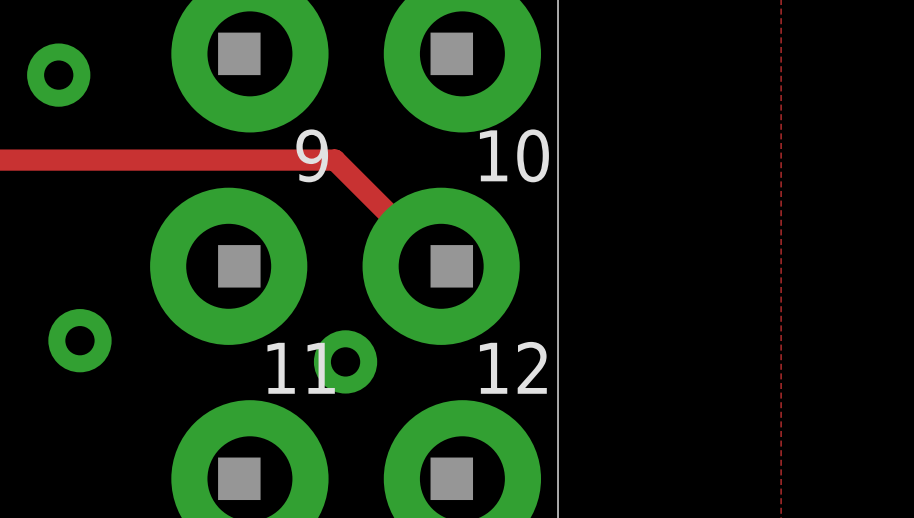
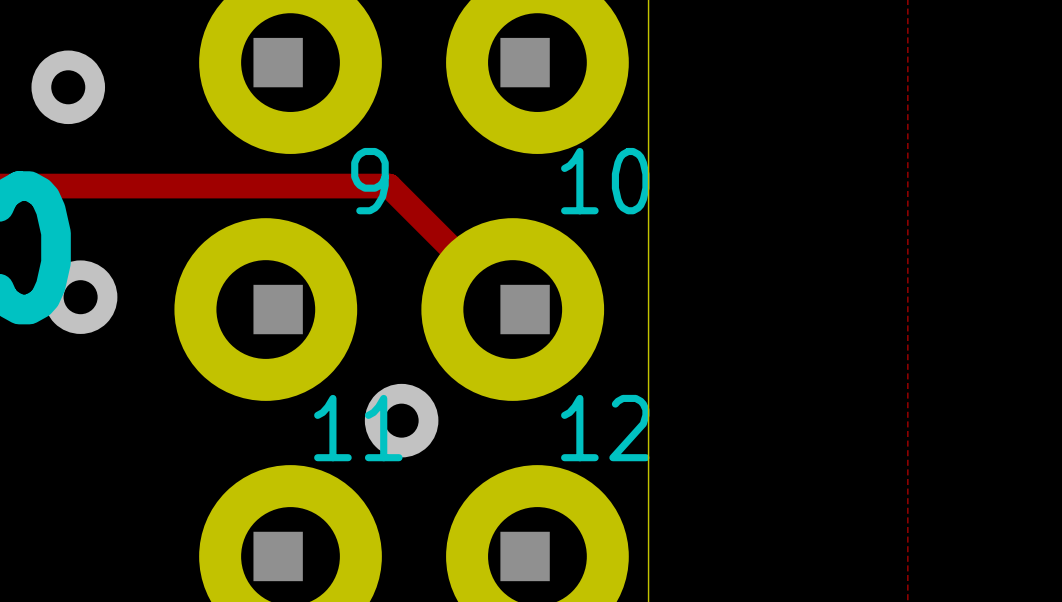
via position: (79, 340) -> (80, 297)

